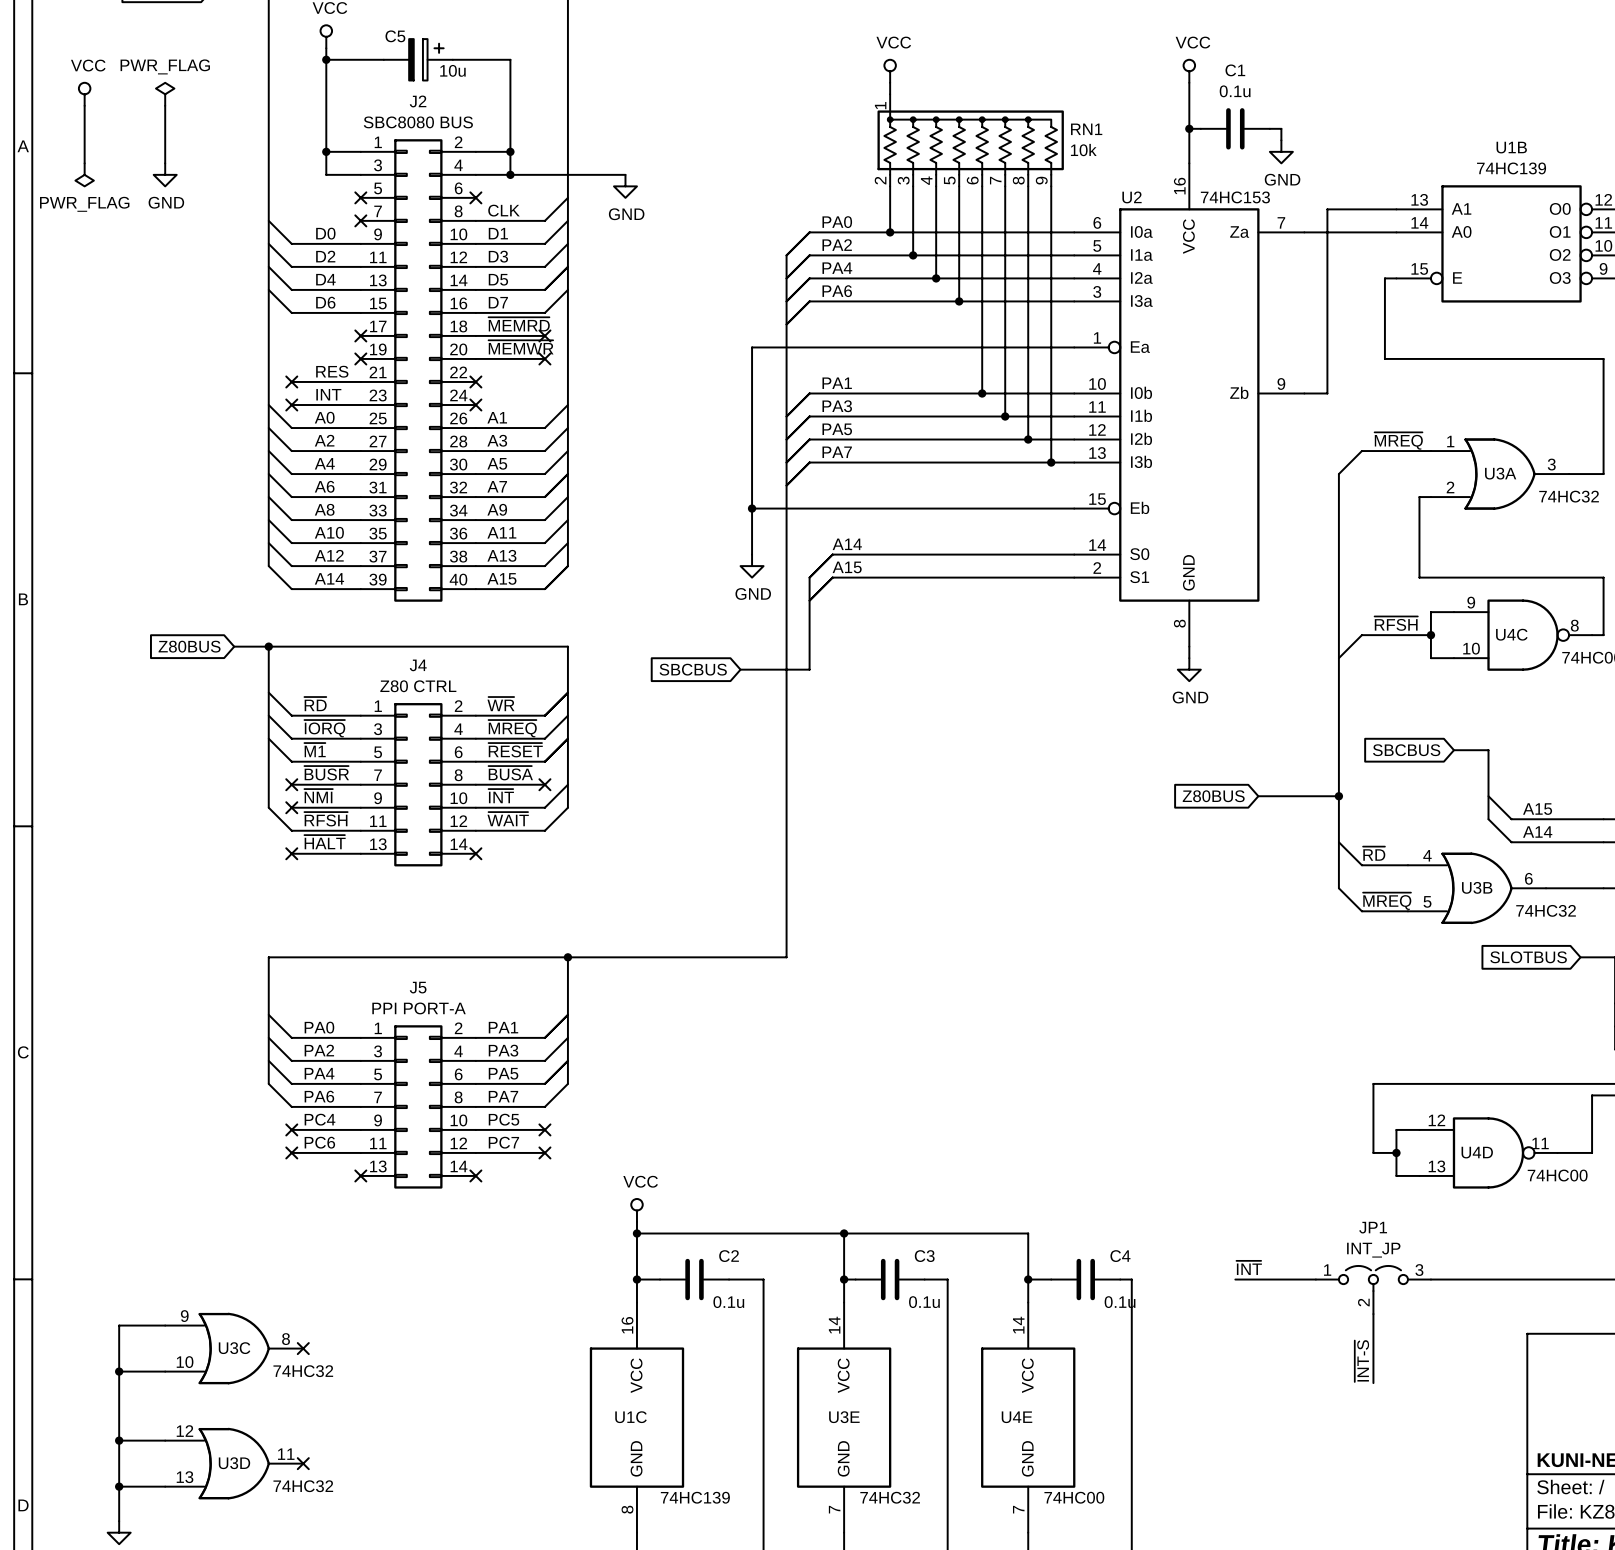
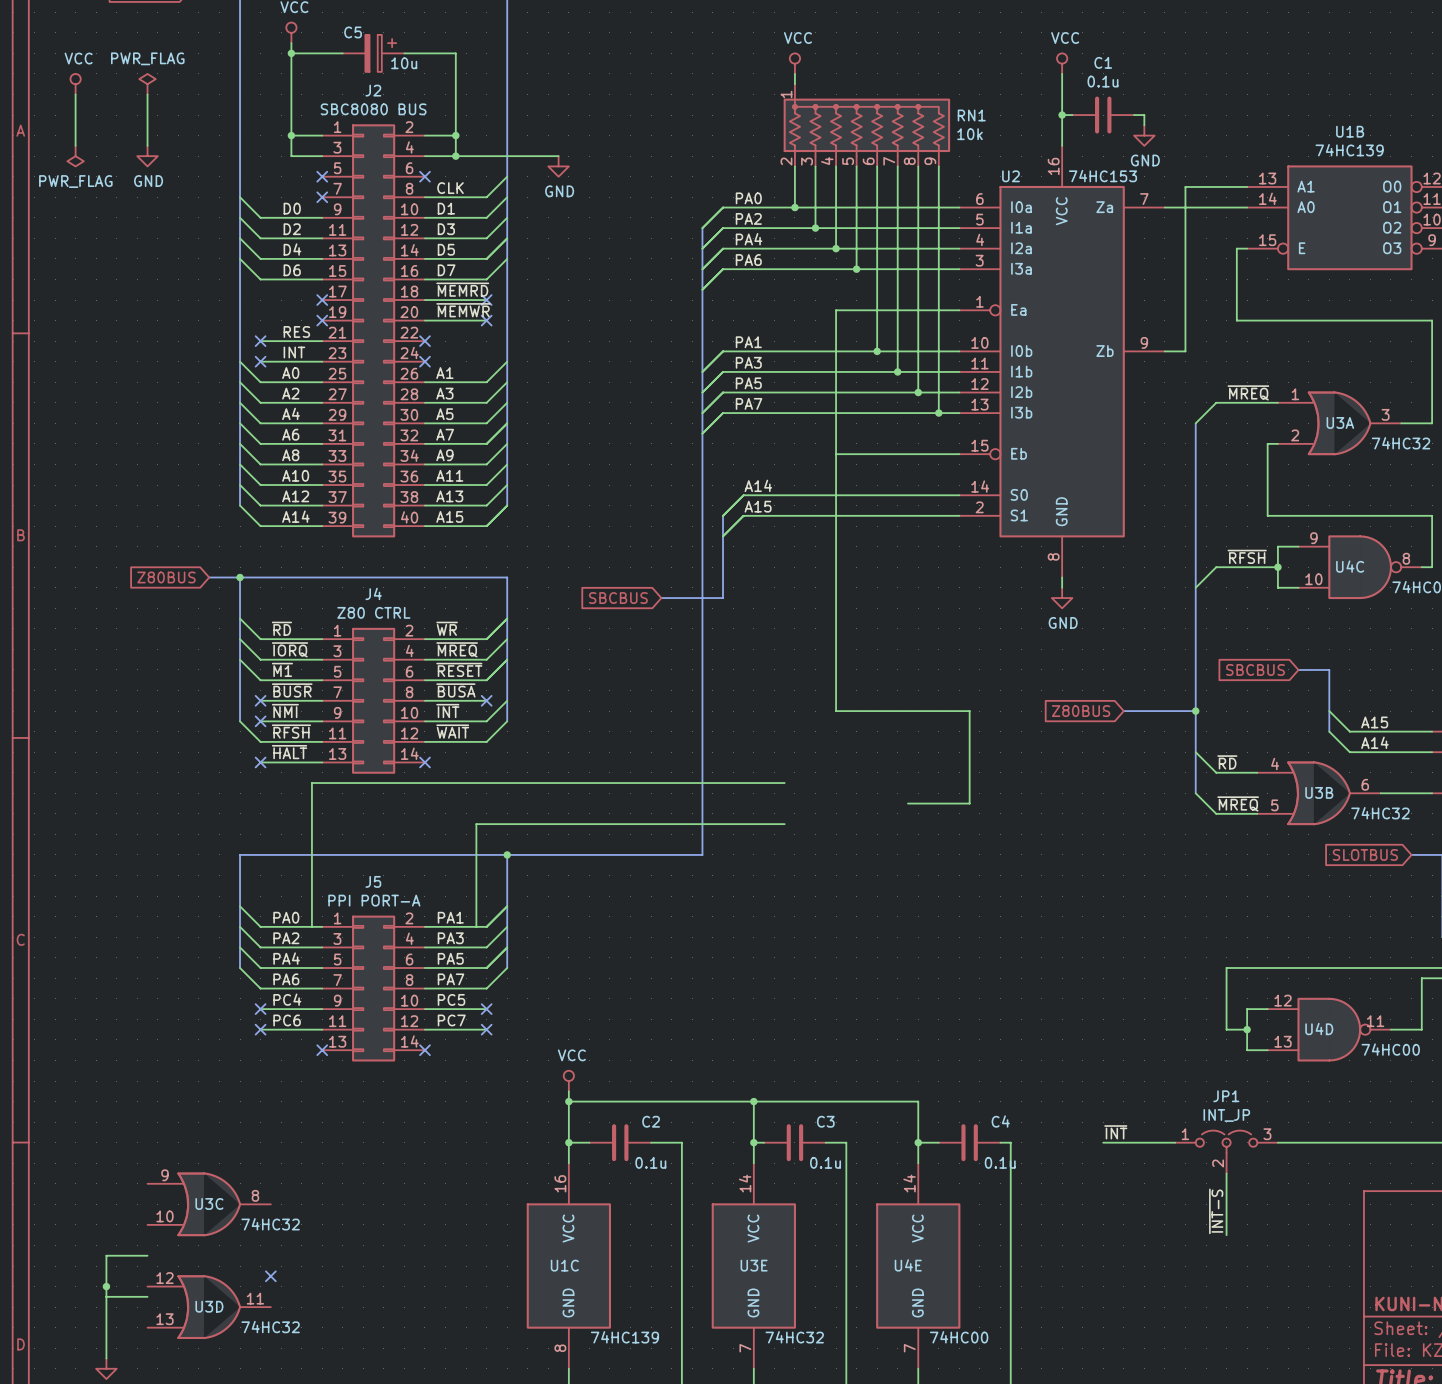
wire: (936, 347) (752, 347) (752, 554) -> (836, 310) (836, 711) (969, 711) (969, 803) (907, 803)
wire: (752, 508) (936, 508) -> none
junction: (752, 508) -> none
power symbol: GND (752, 566) -> none
wire: none -> (784, 783) (311, 783) (311, 926)
wire: none -> (784, 824) (476, 824) (476, 926)
wire: (165, 1325) (119, 1325) (119, 1406) -> (147, 1255) (106, 1255)
no-connect mark: (303, 1348) -> none
wire: (119, 1371) (165, 1371) -> none
junction: (119, 1371) -> none
wire: (119, 1440) (165, 1440) -> none
no-connect mark position: (303, 1463) -> (270, 1276)
wire: (119, 1486) (165, 1486) -> (106, 1296) (147, 1296)
junction: (119, 1486) -> none

